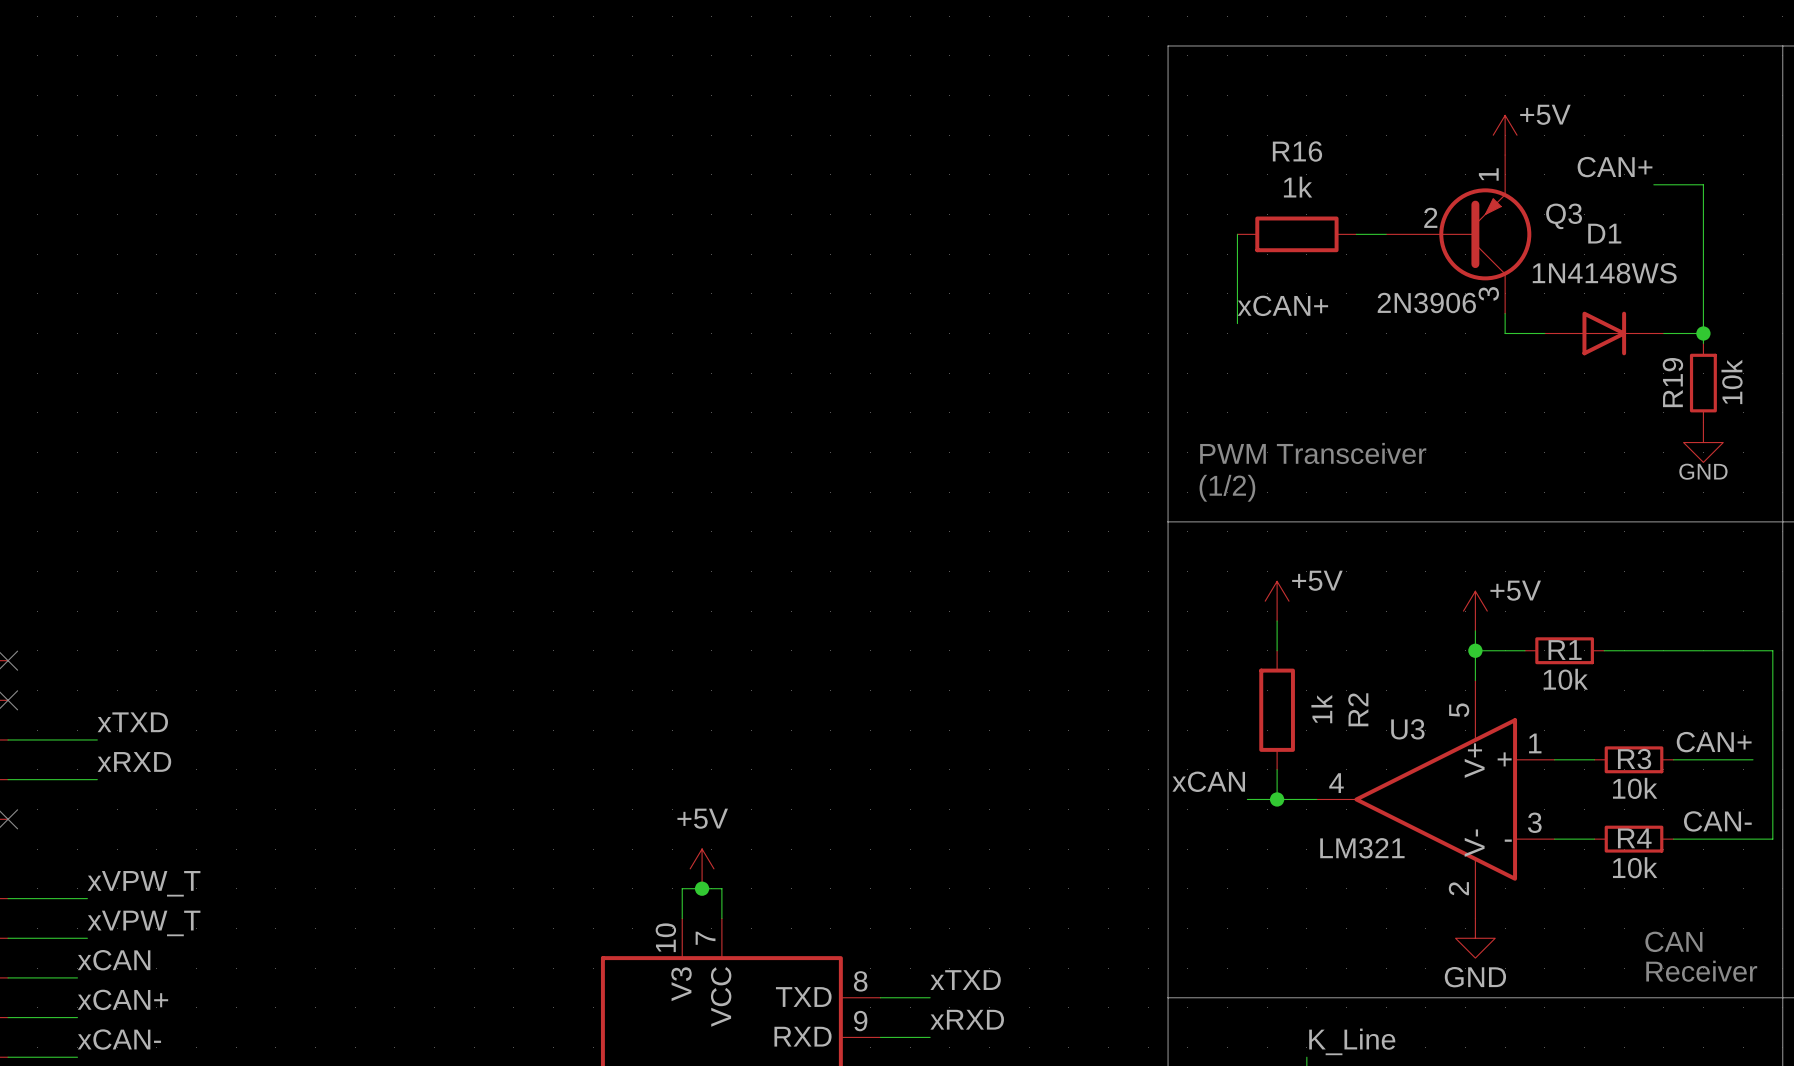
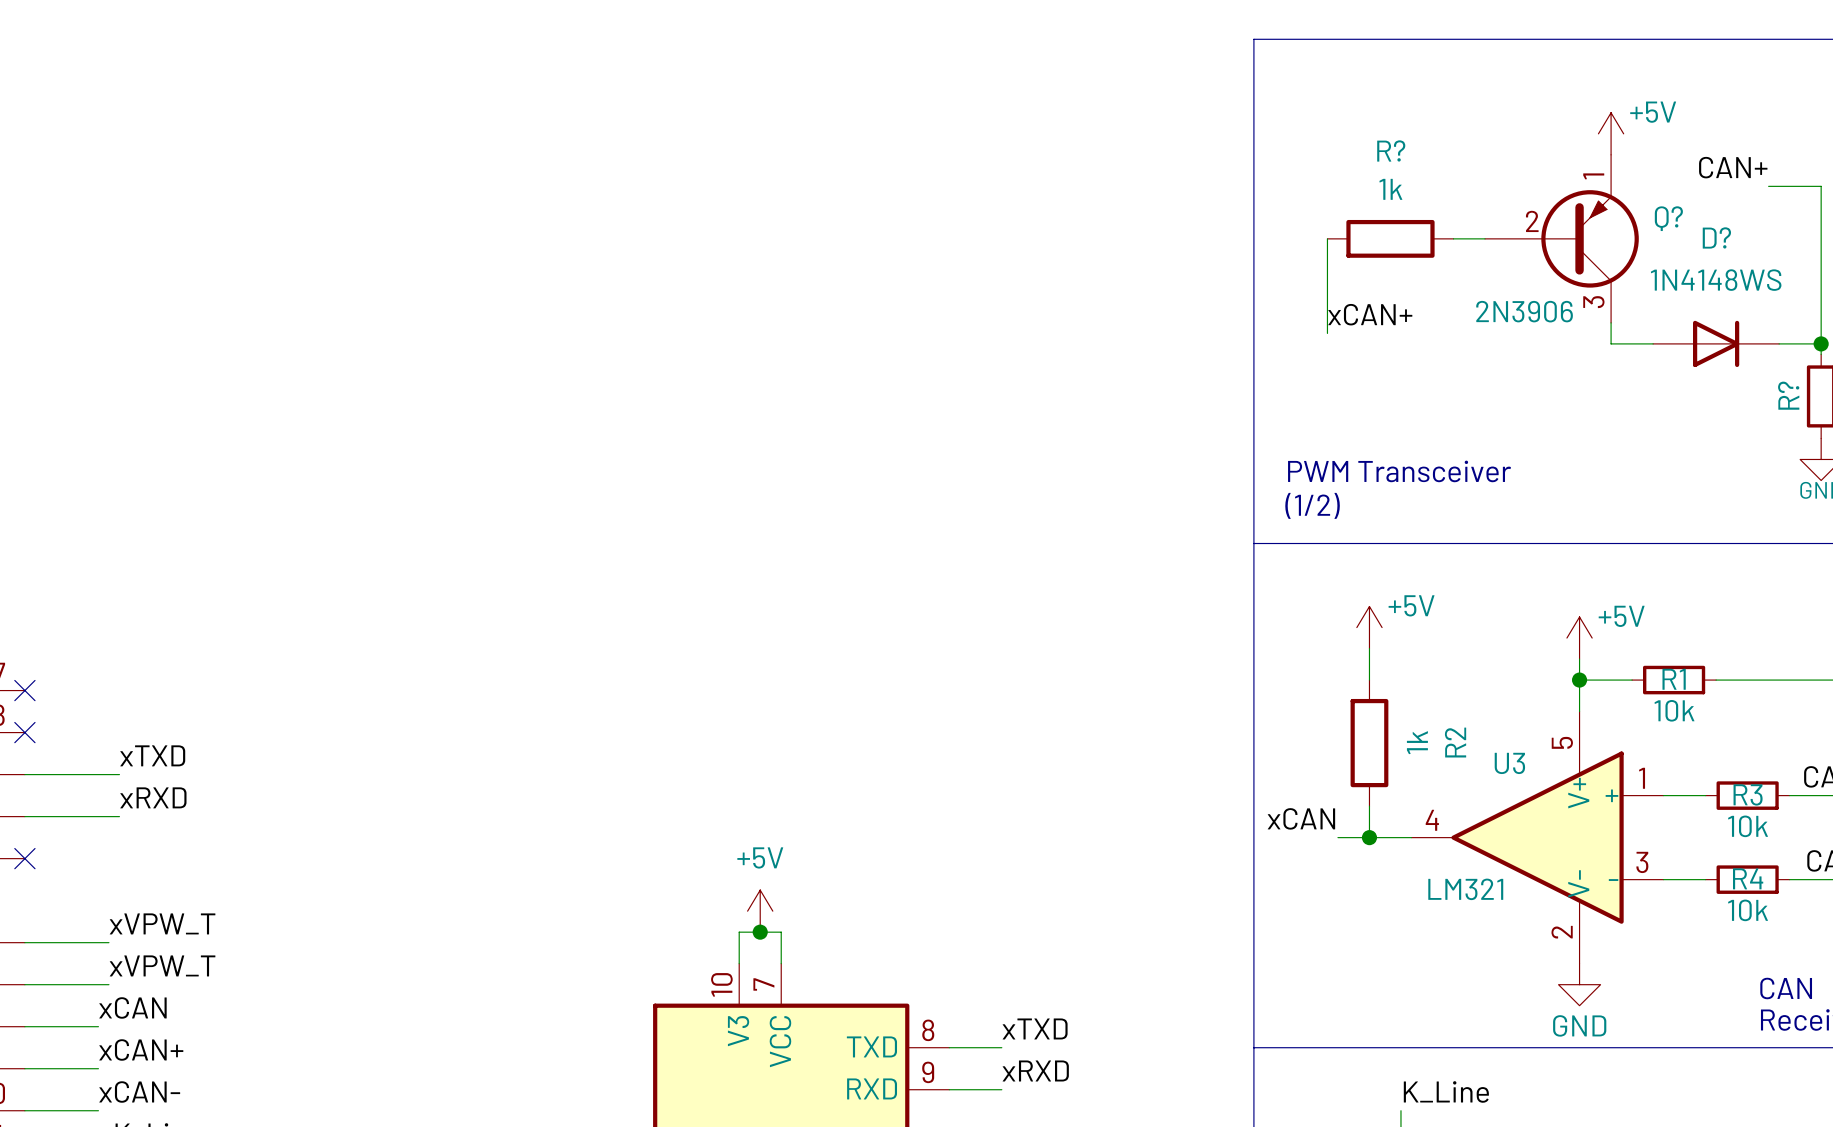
R16 name: R16 (1297, 151) -> R? (1391, 150)
Q3 name: Q3 (1564, 216) -> Q? (1668, 218)
D1 name: D1 (1604, 233) -> D? (1716, 237)
R19 name: R19 (1672, 382) -> R? (1788, 395)

